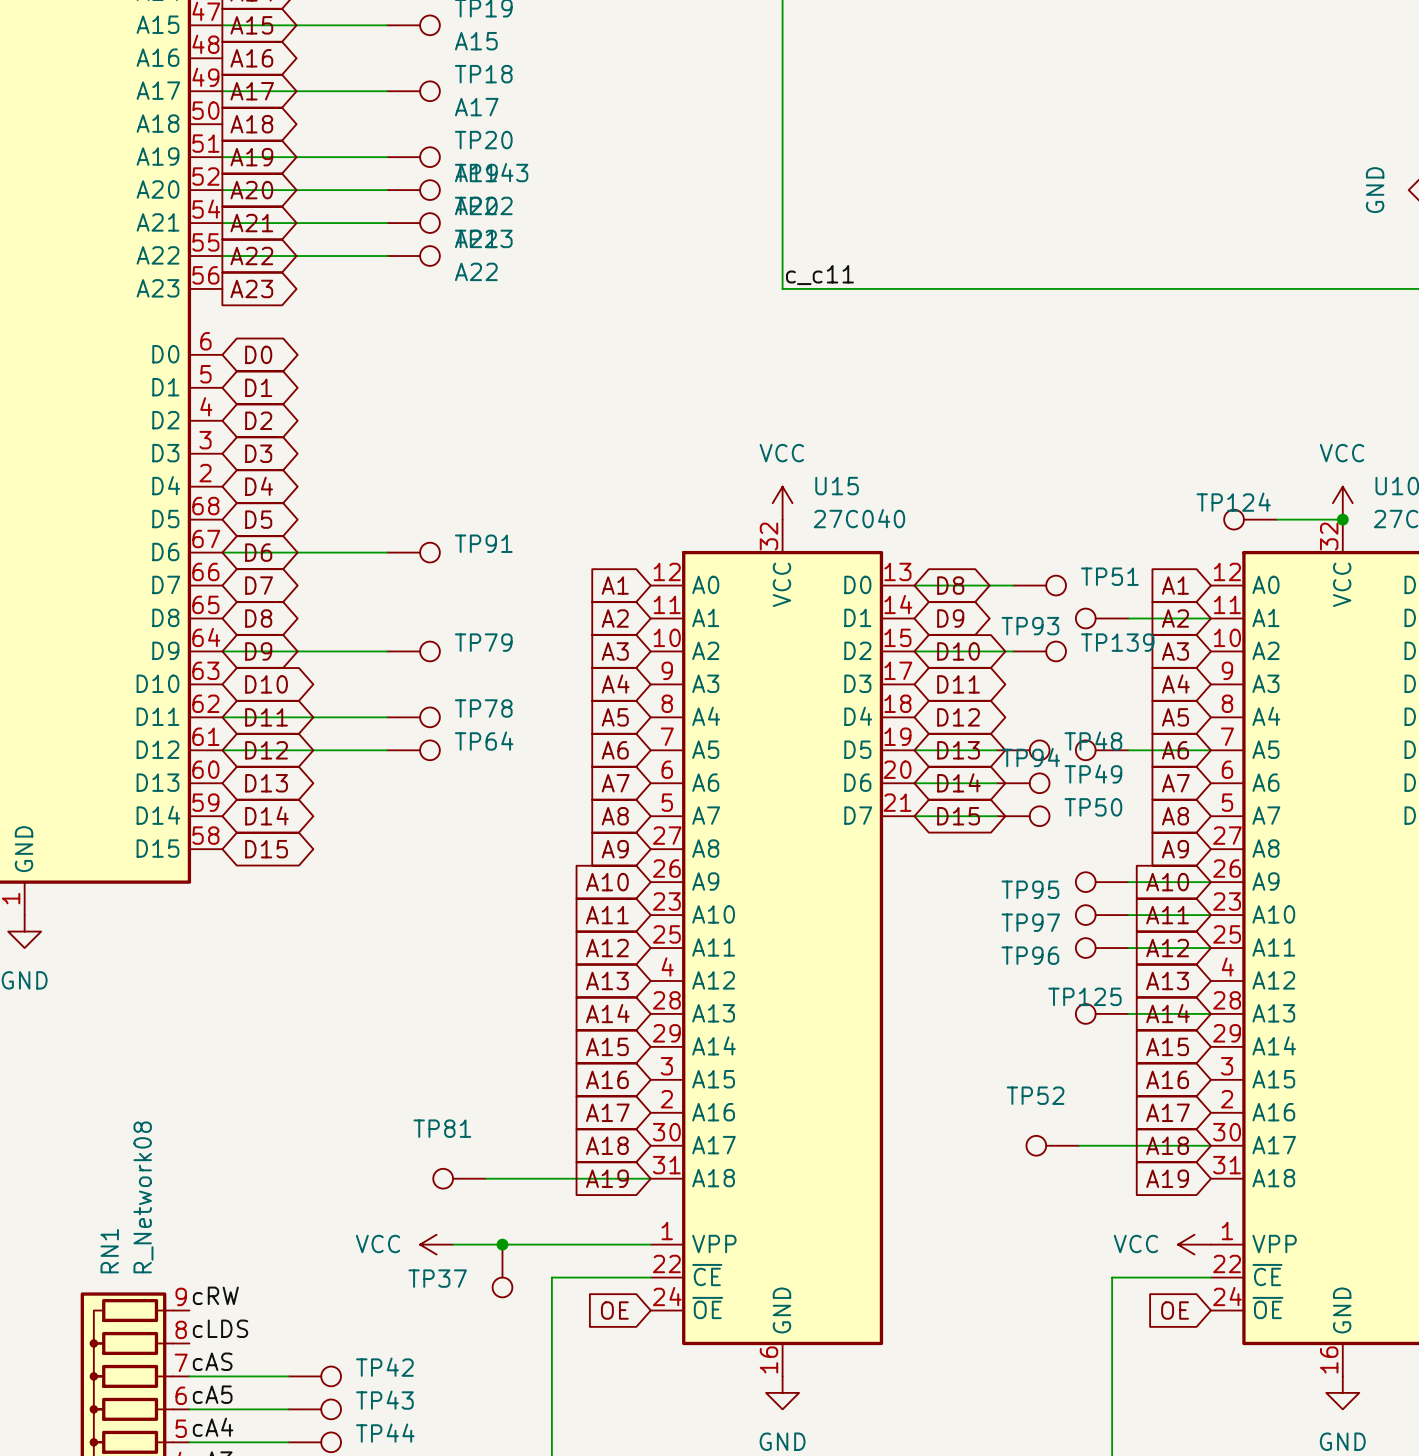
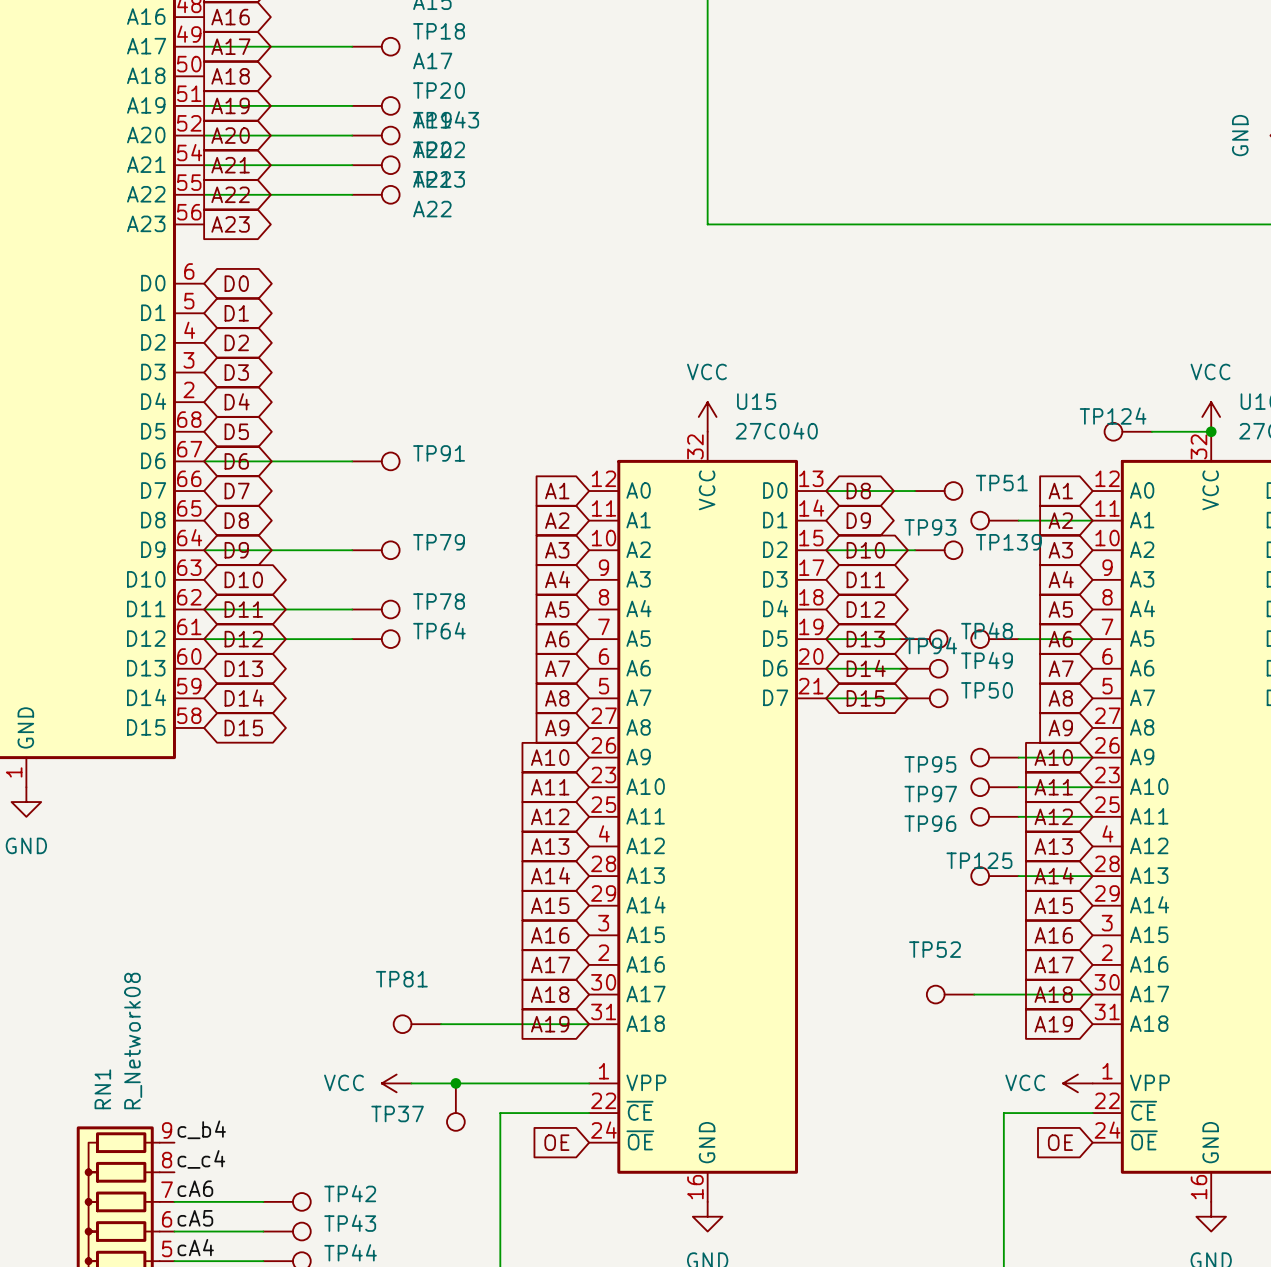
label: c_c11 (819, 275) -> none
label: cRW (215, 1295) -> c_b4 (201, 1129)
label: cLDS (220, 1328) -> c_c4 (201, 1159)
label: cAS (212, 1361) -> cA6 (195, 1188)

